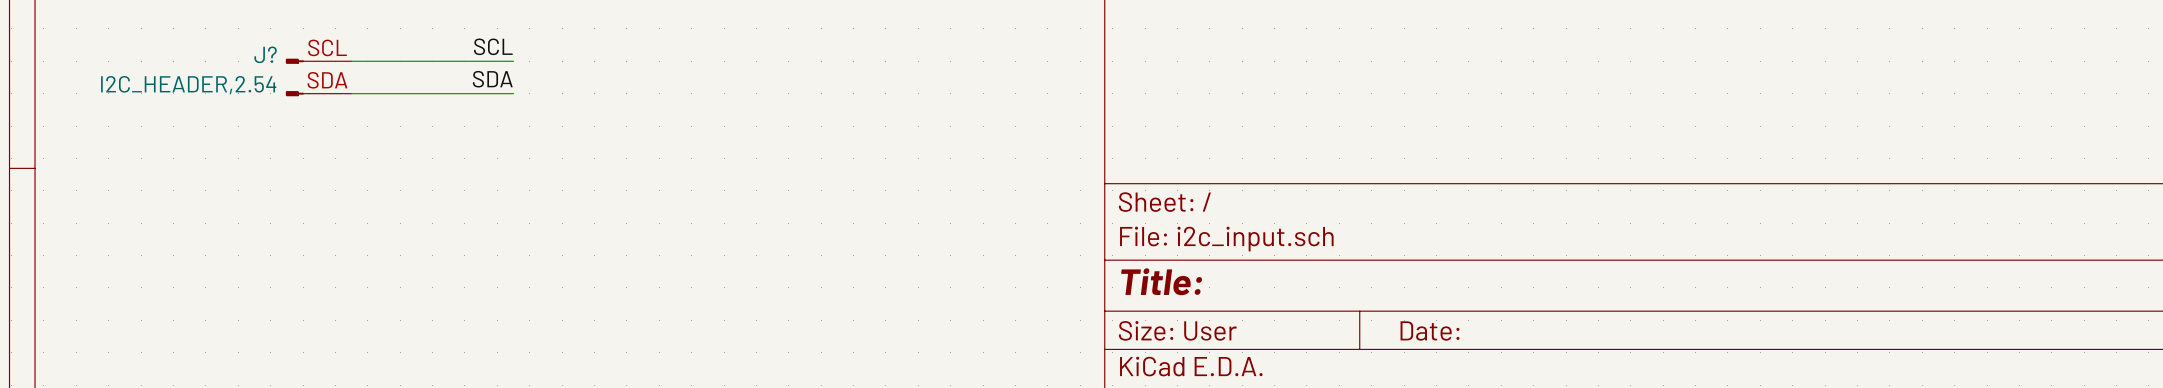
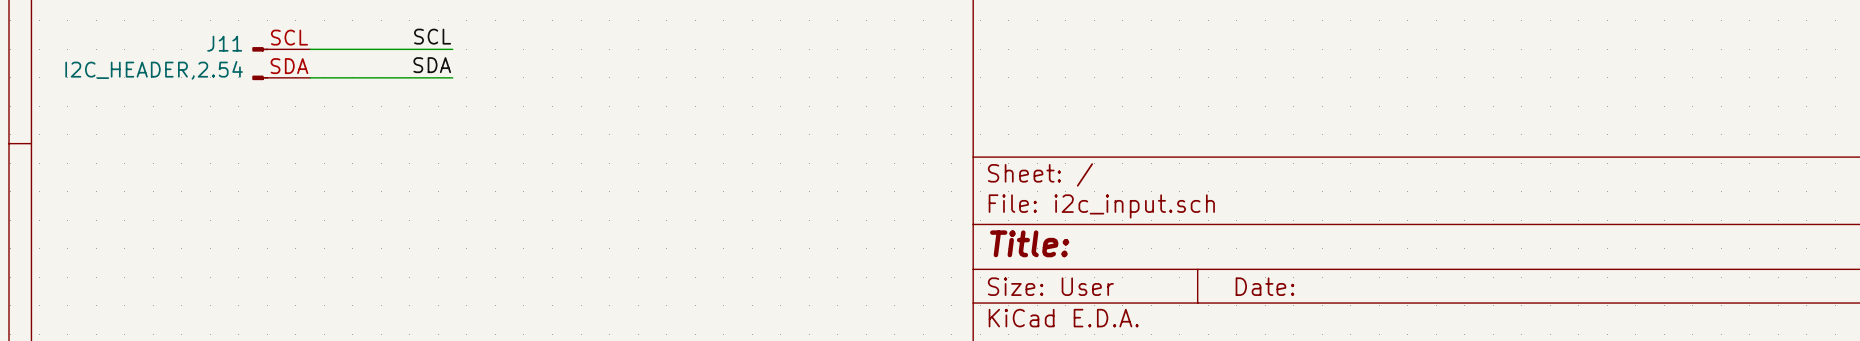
J? name: J? (265, 54) -> J11 (224, 43)

